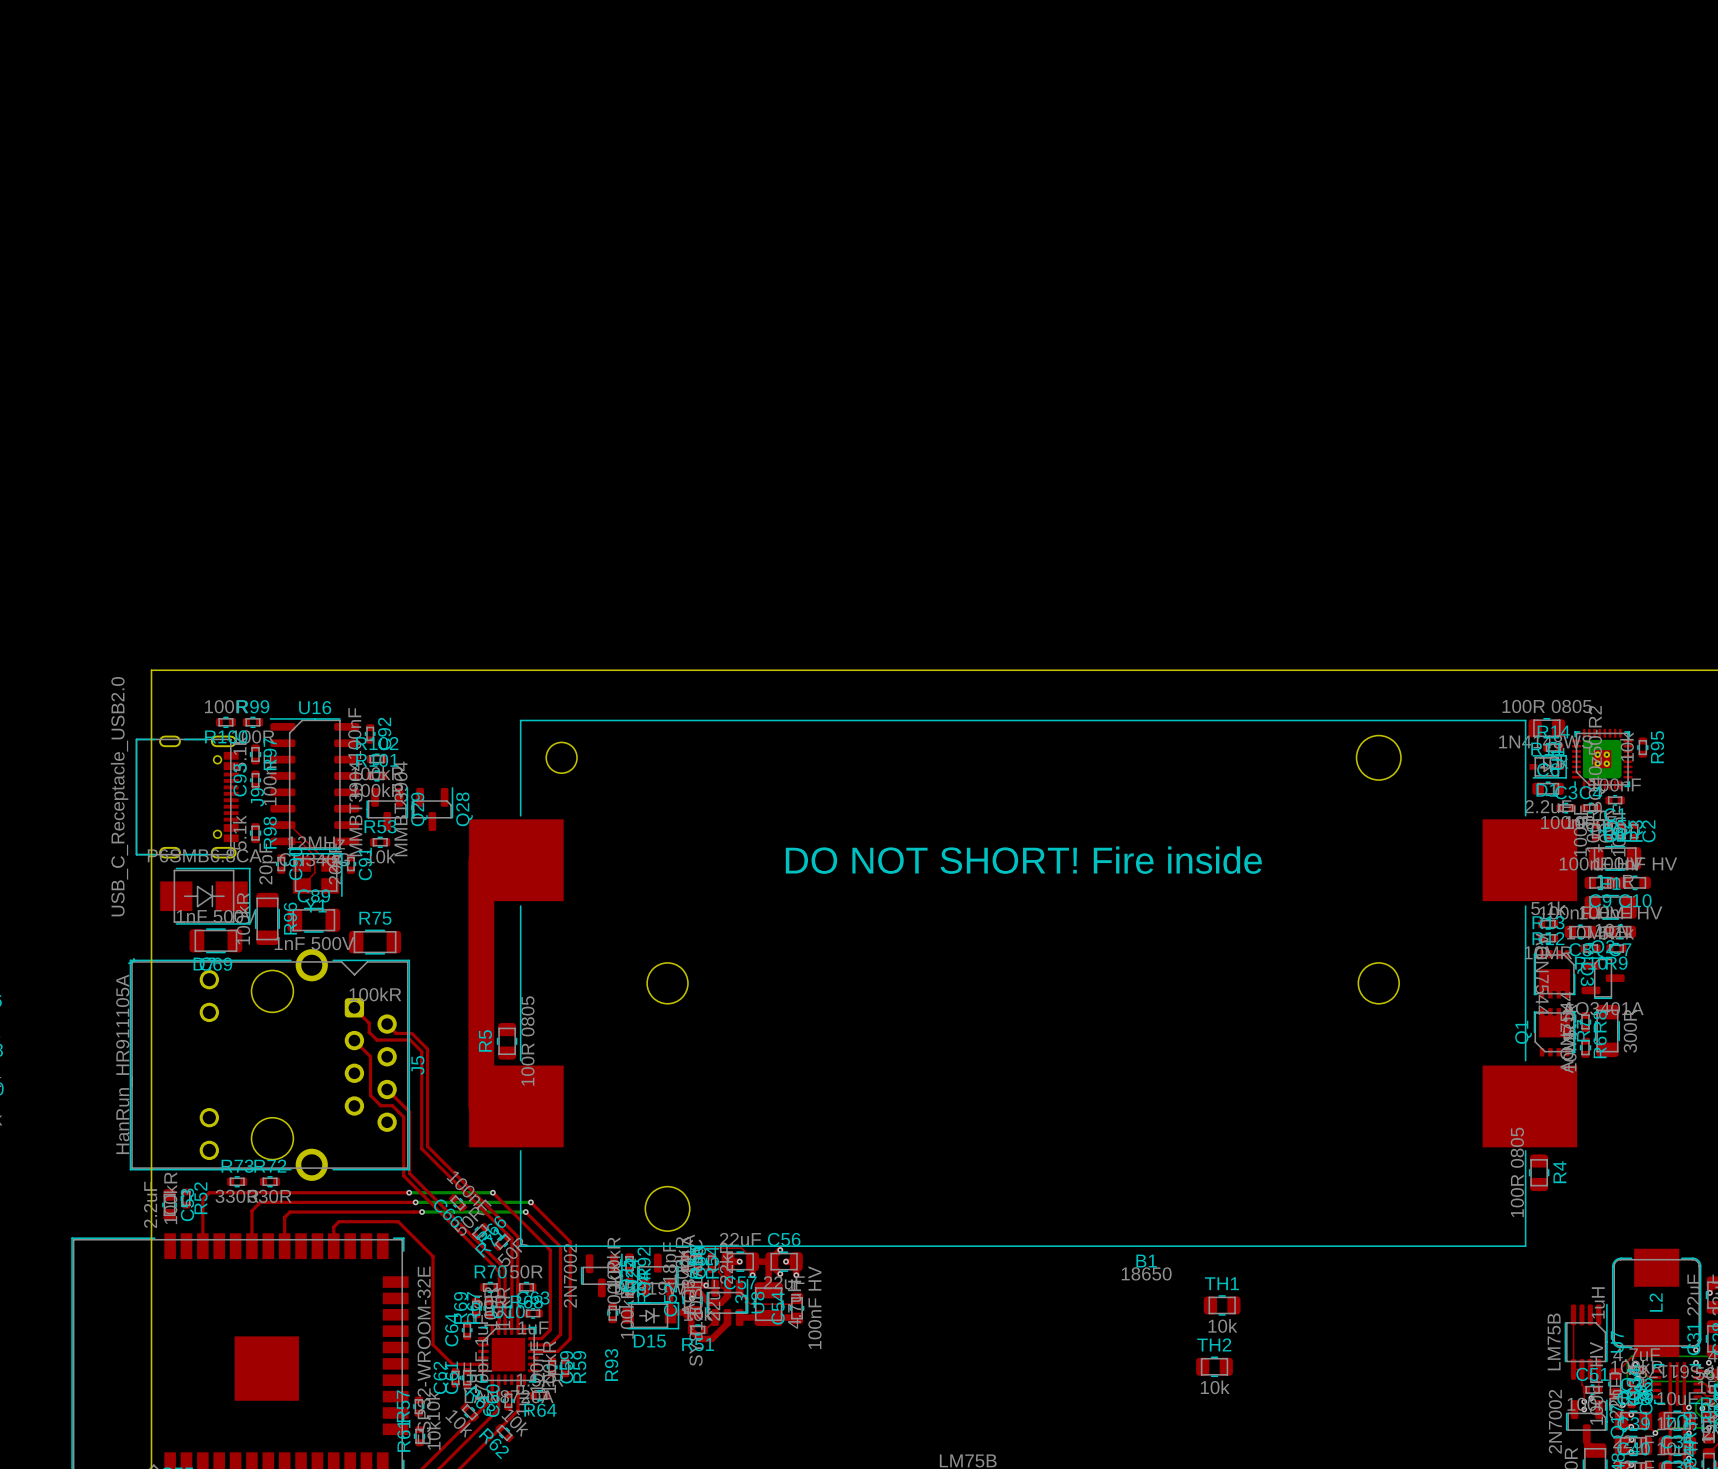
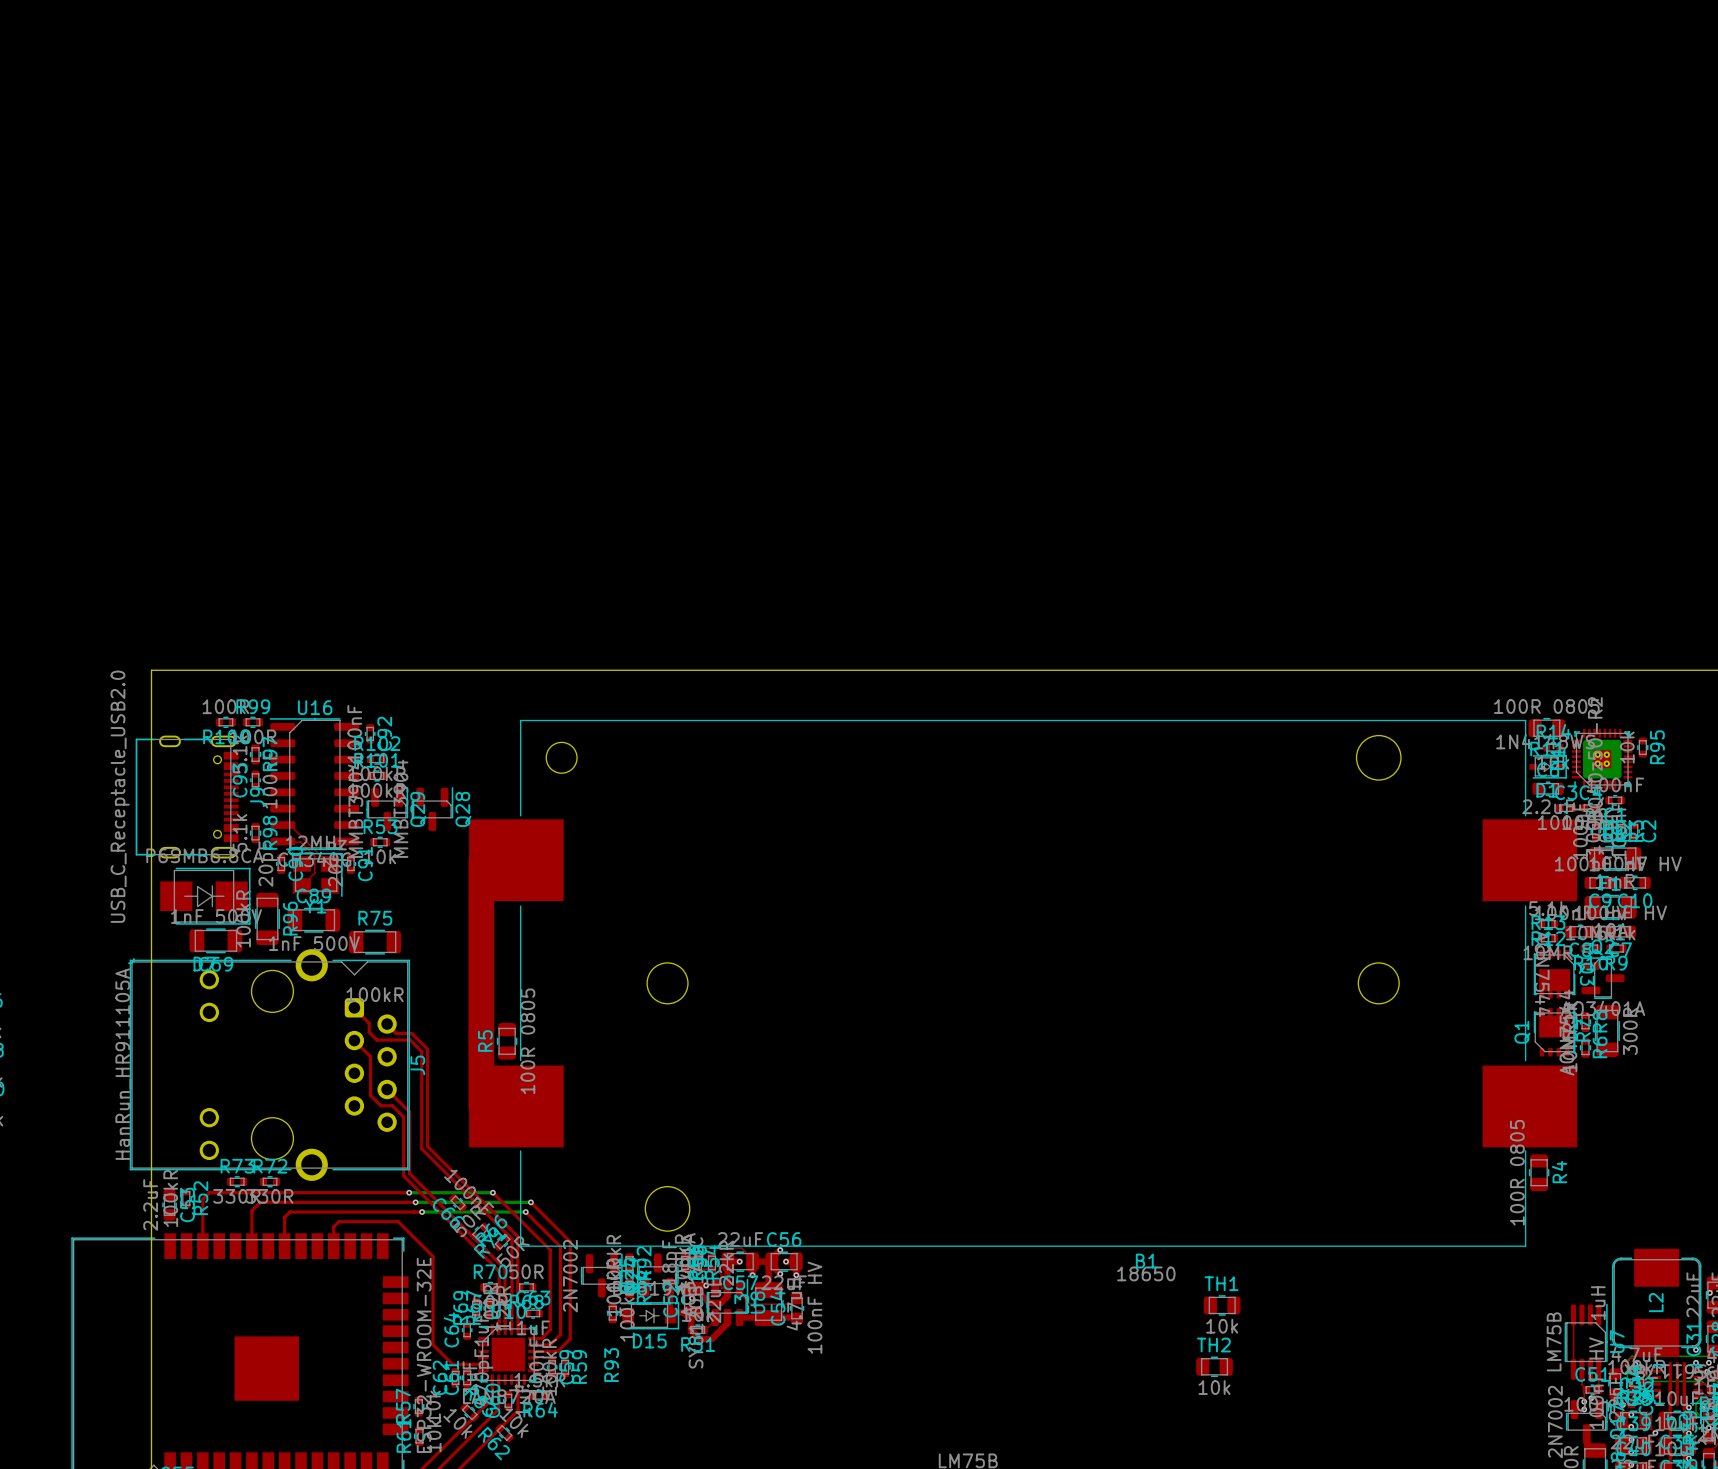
text: DO NOT SHORT! Fire inside (1023, 860) -> none

